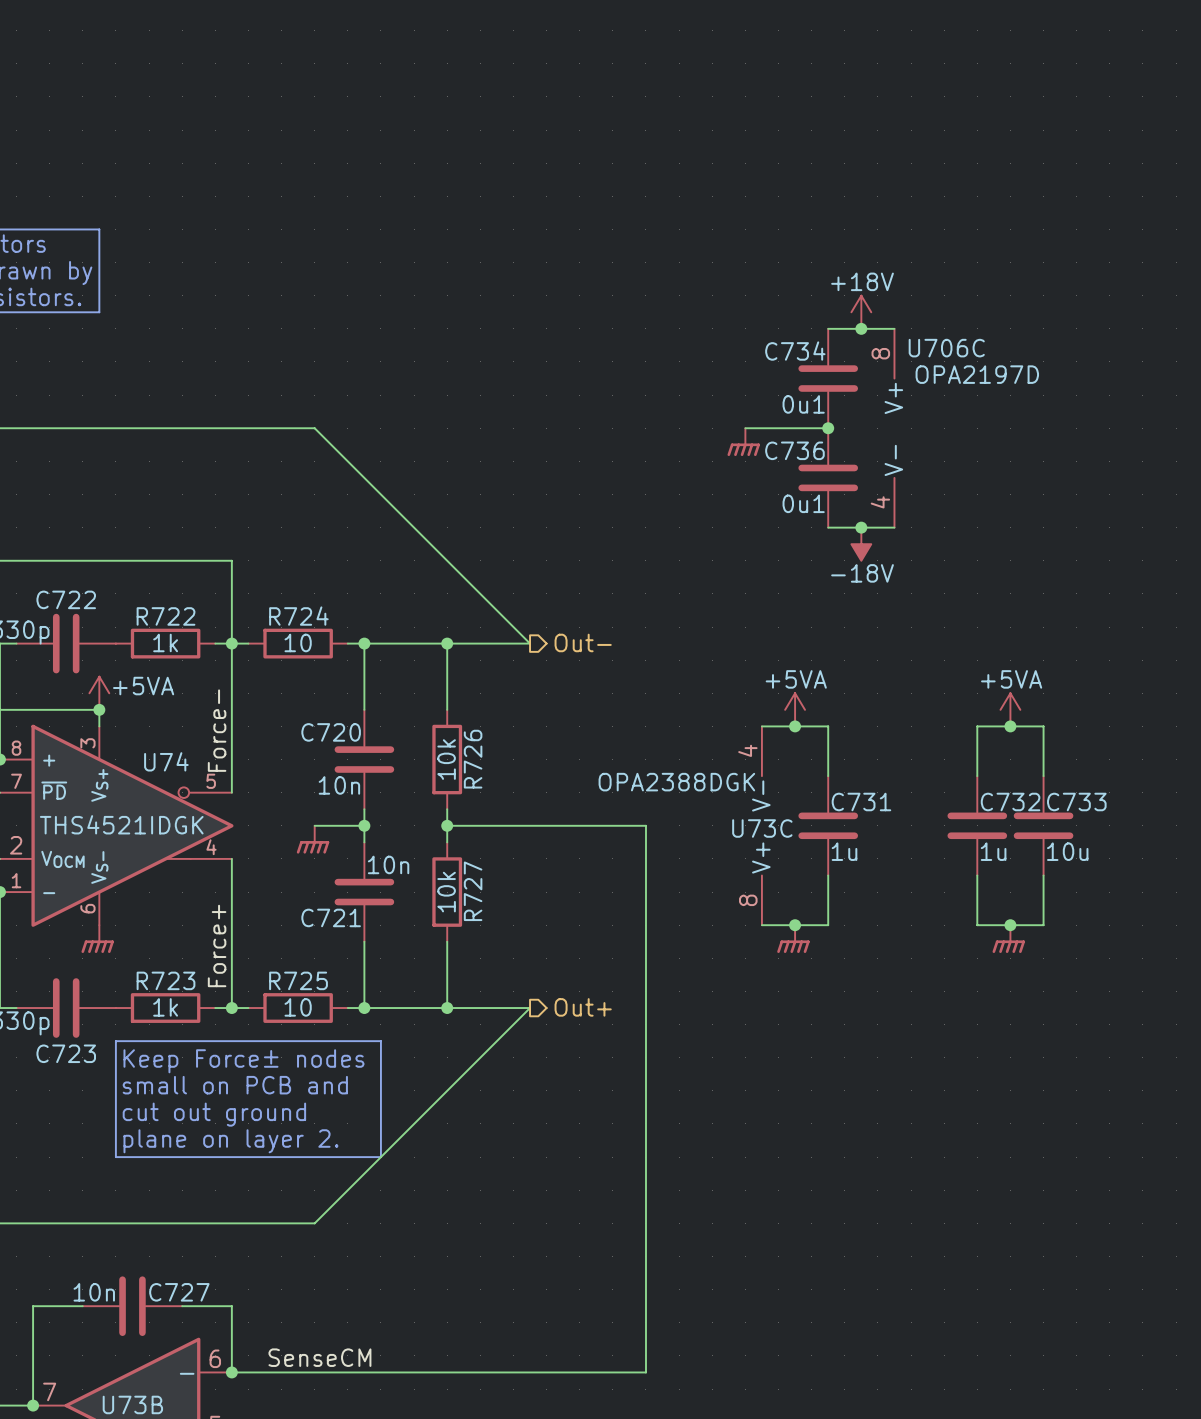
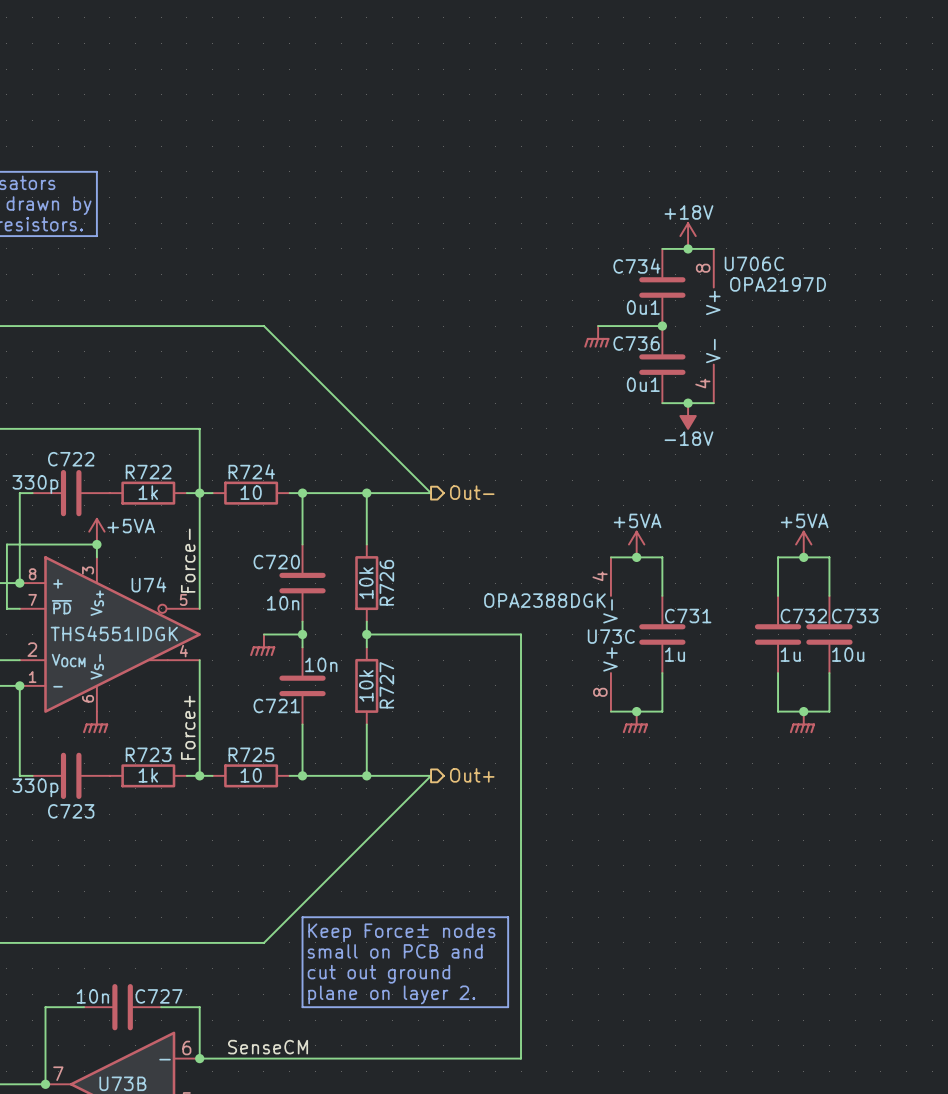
U74 value: THS4521IDGK (121, 824) -> THS4551IDGK (114, 633)
line: (115, 1041) (380, 1041) (380, 1157) (115, 1157) (115, 1041) -> (302, 917) (508, 917) (508, 1007) (302, 1007) (302, 917)
text position: Keep Force± nodes (243, 1061) -> Keep Force± nodes (401, 932)
text position: small on PCB and (235, 1085) -> small on PCB and (395, 951)
text position: cut out ground (214, 1114) -> cut out ground (378, 974)
text position: plane on layer 2. (230, 1141) -> plane on layer 2. (391, 994)

